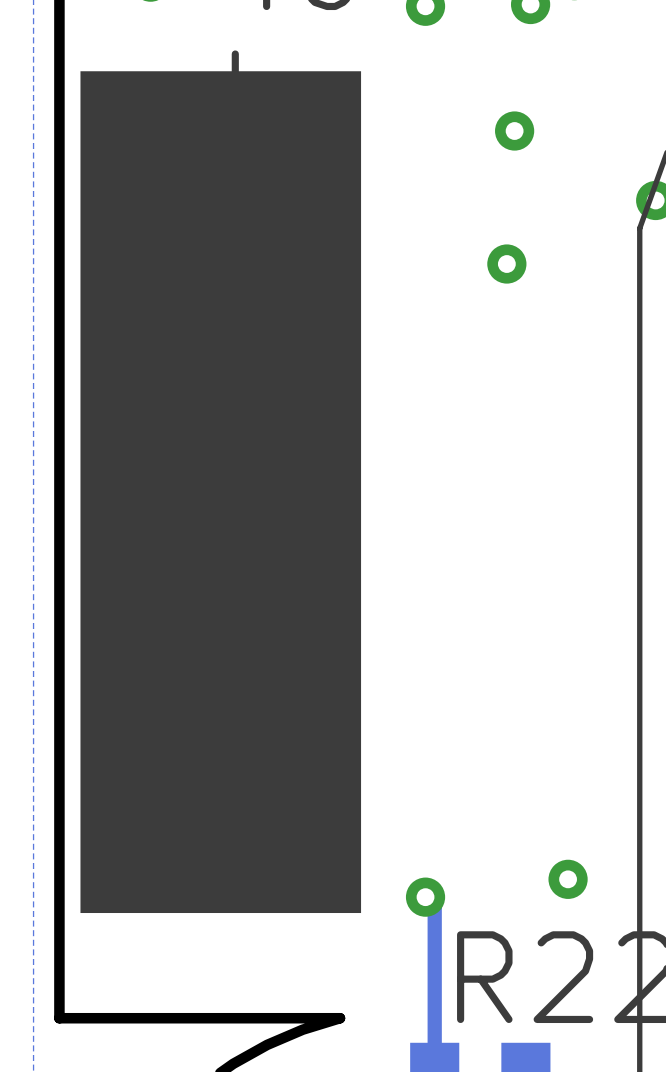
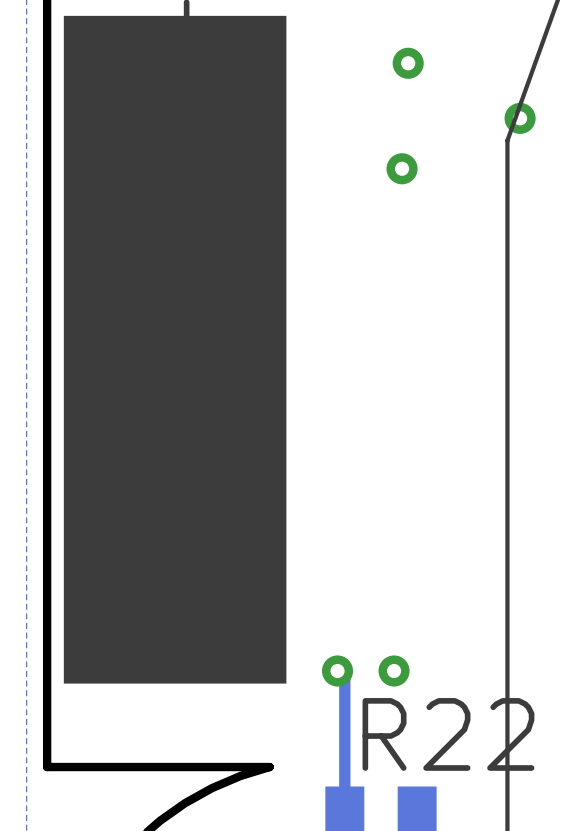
via position: (568, 879) -> (394, 670)

